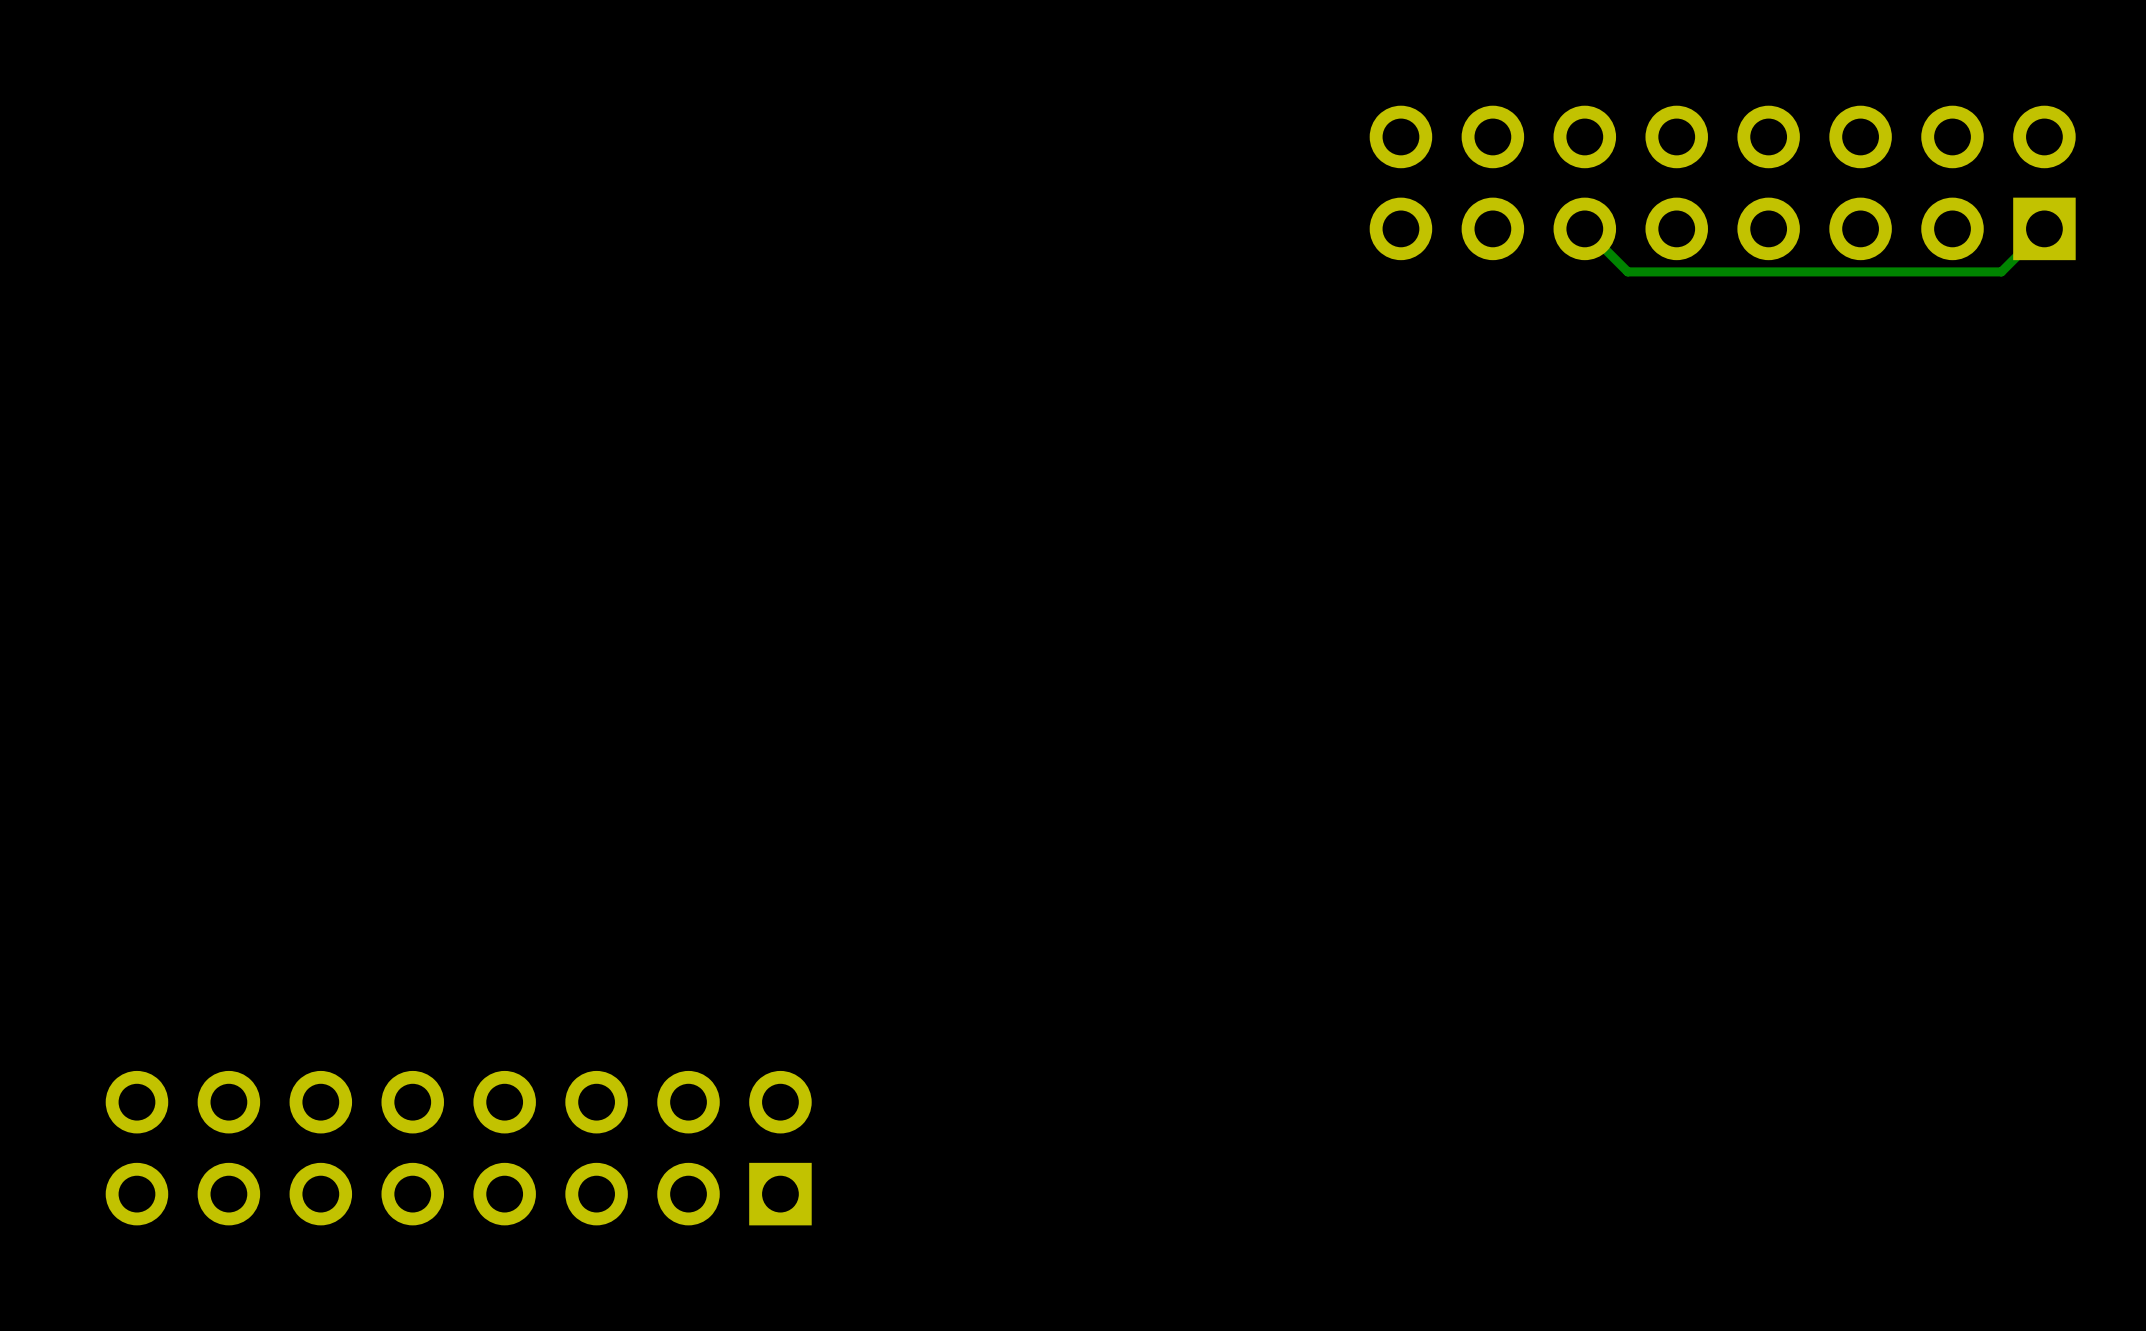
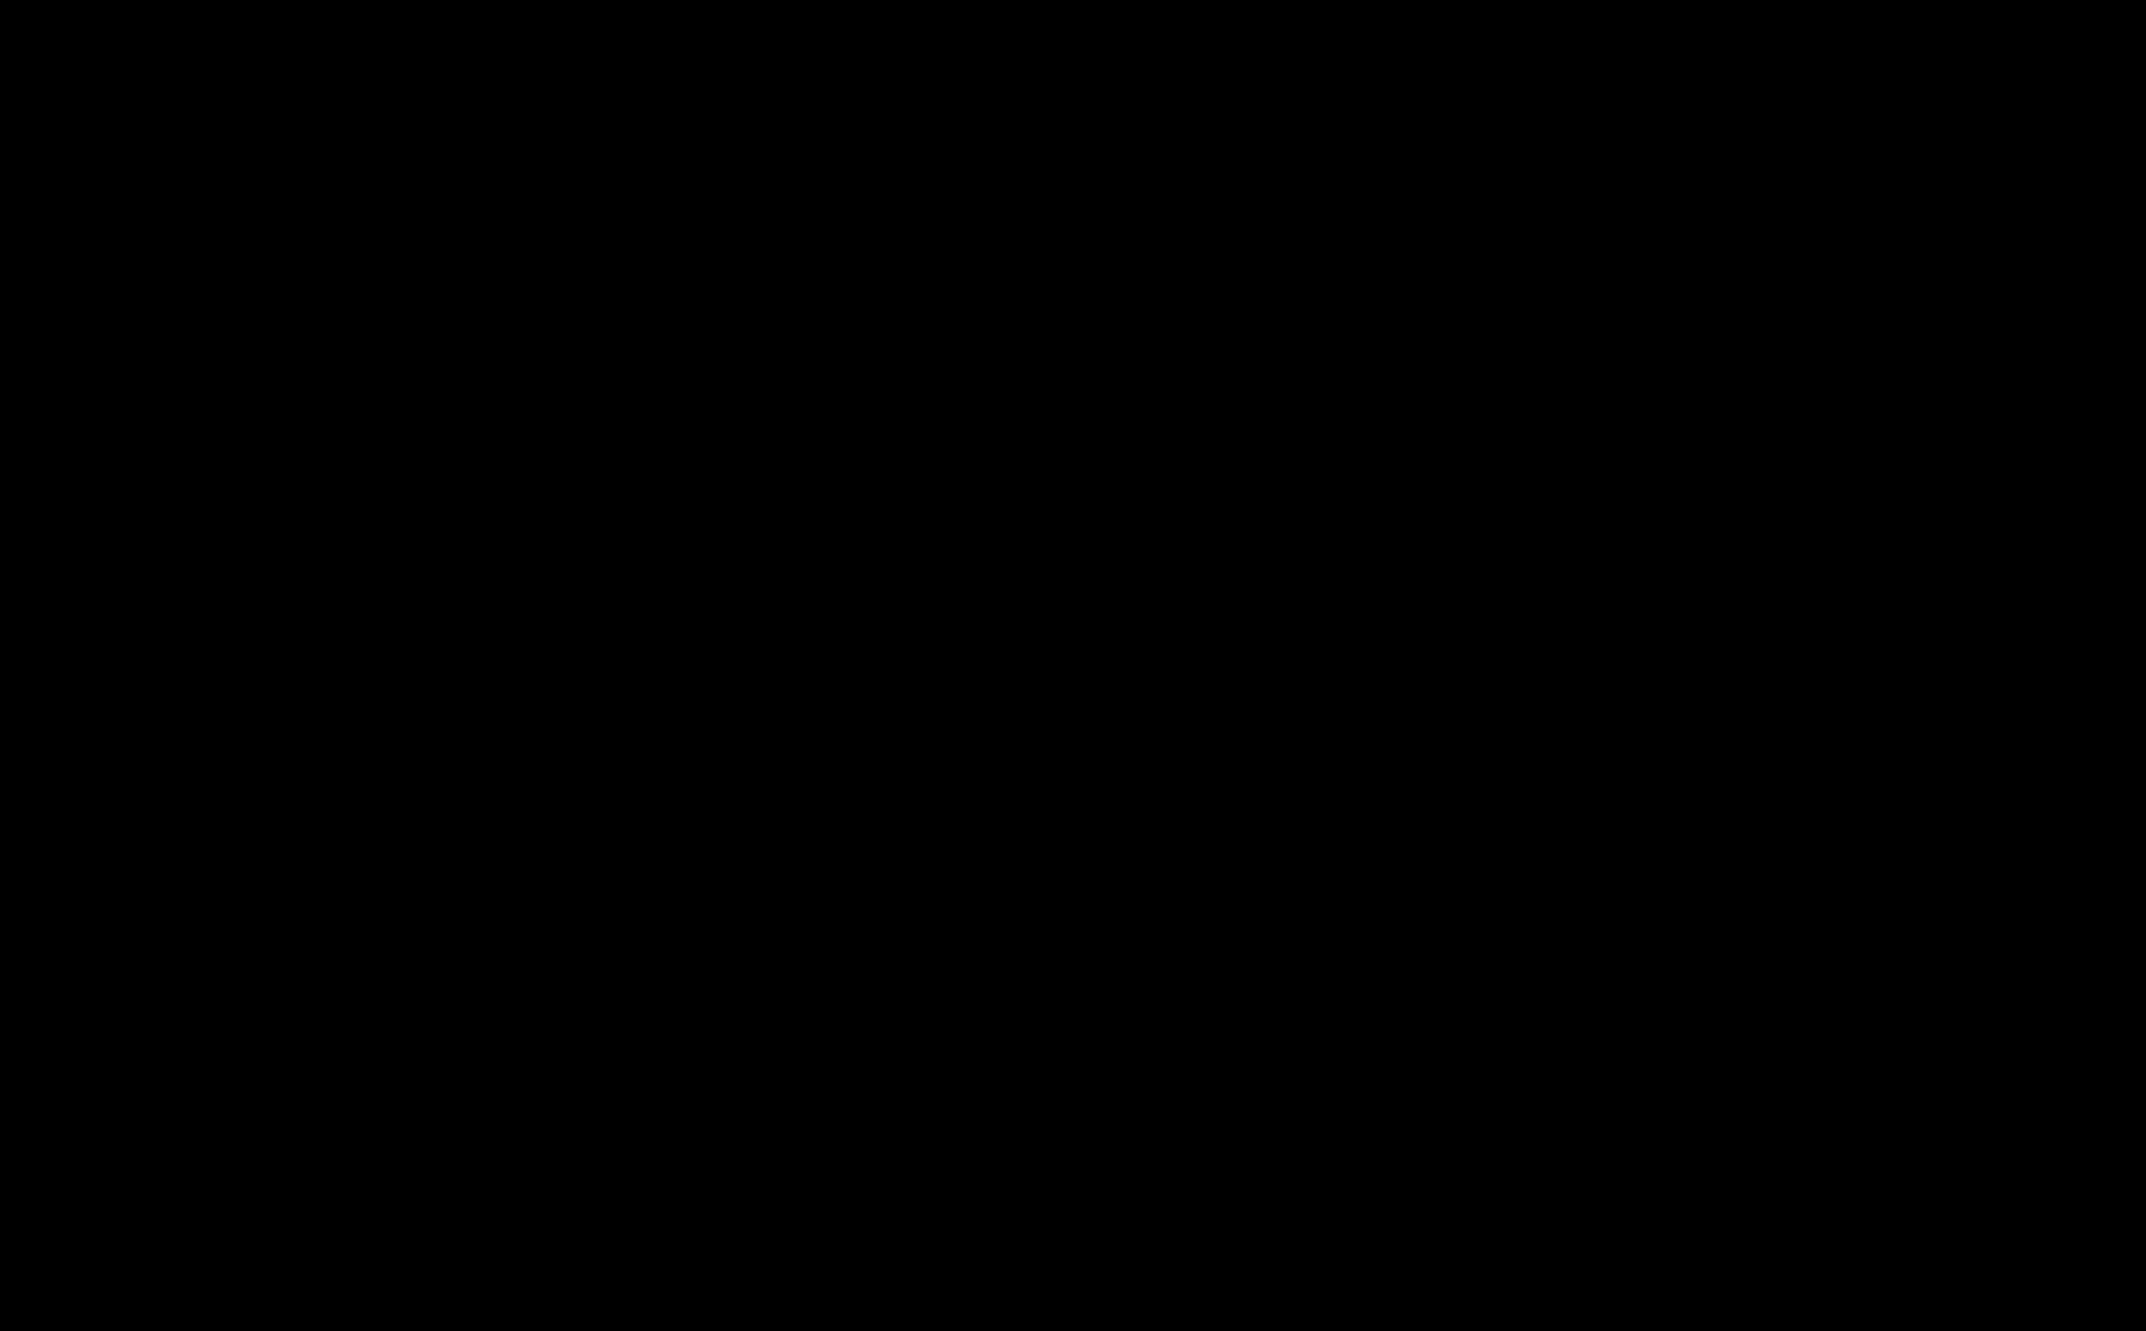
part: (1722, 182) -> none
track: (2044, 228) (2001, 271) (1627, 271) (1584, 228) -> none
part: (458, 1148) -> none

